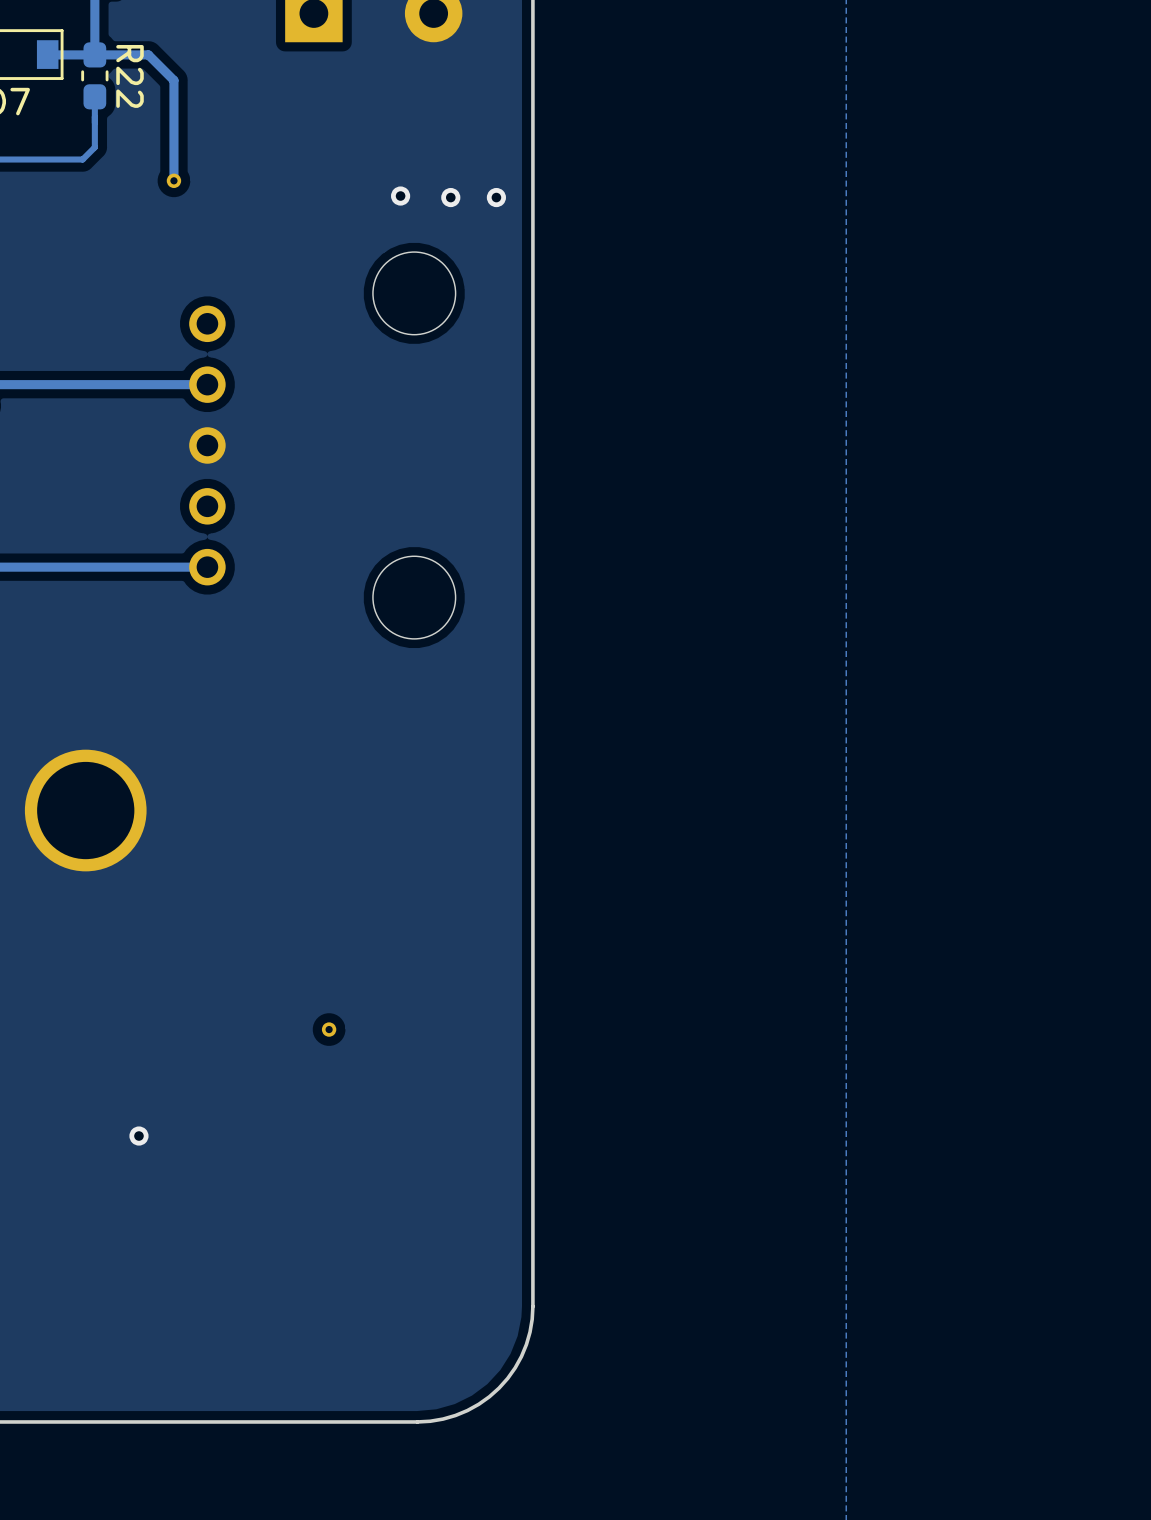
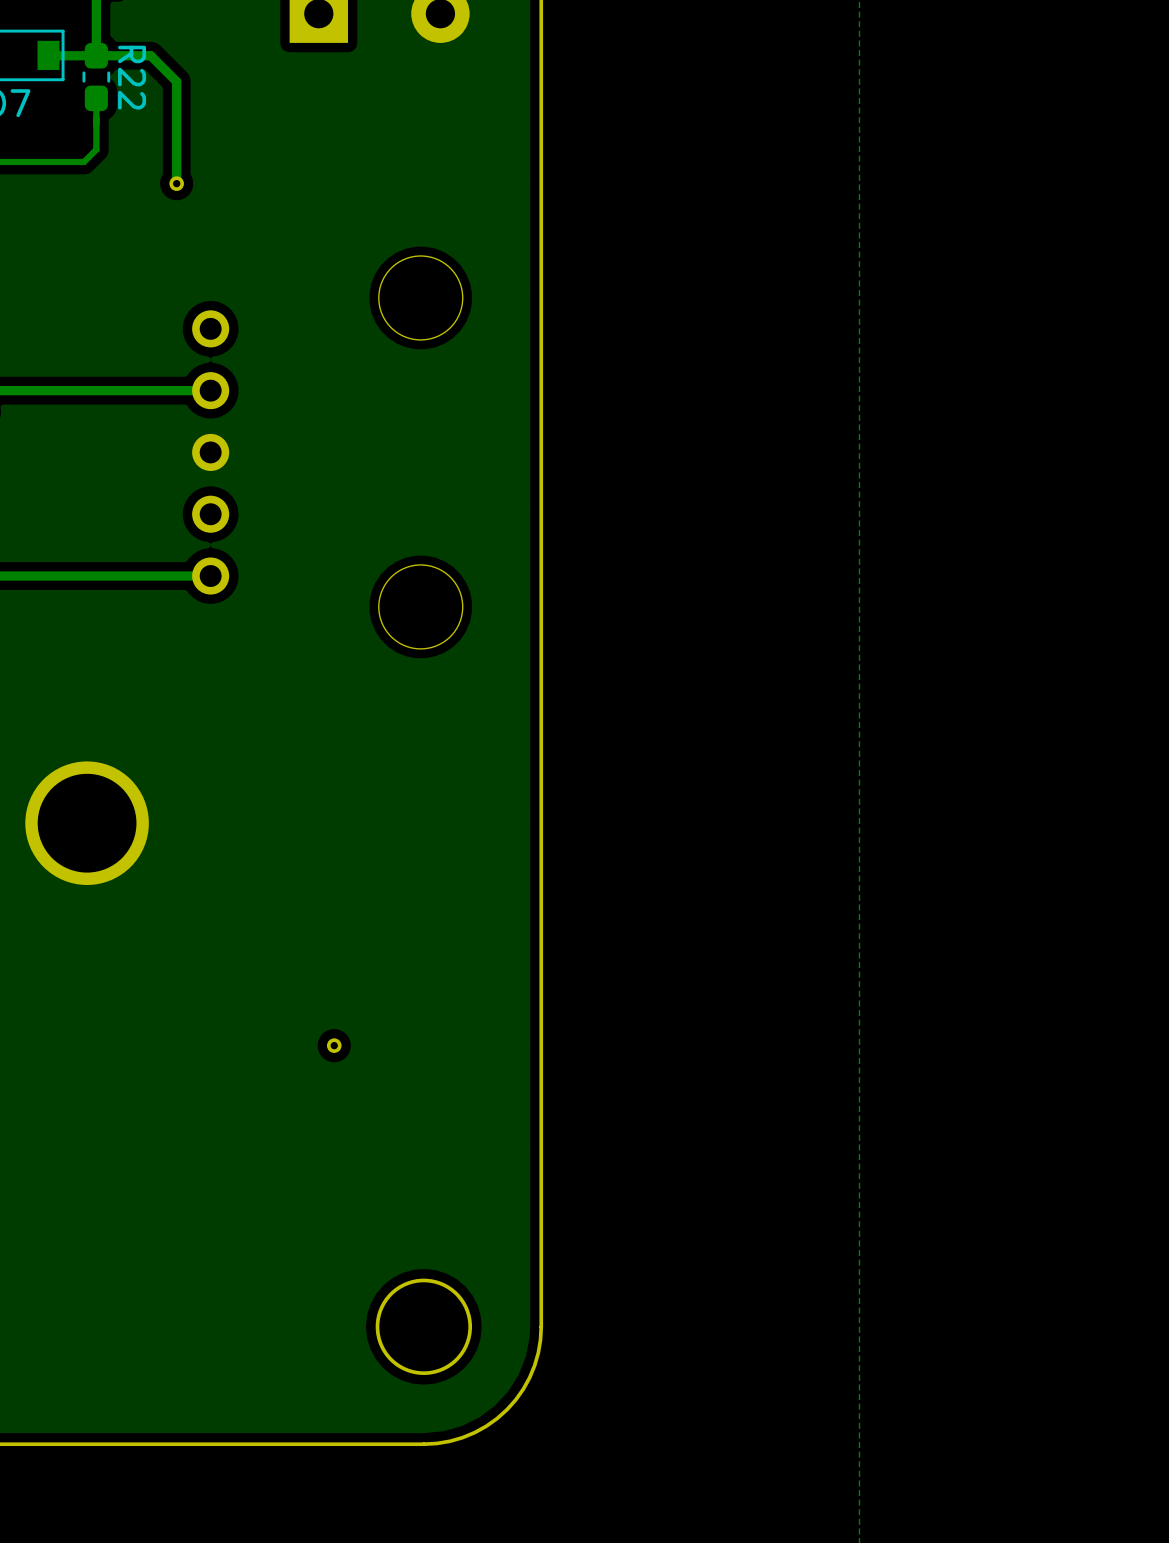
via: (400, 196) -> none
via: (450, 197) -> none
via: (496, 197) -> none
via: (138, 1136) -> none
round board edge: none -> [375, 1278, 473, 1375]

